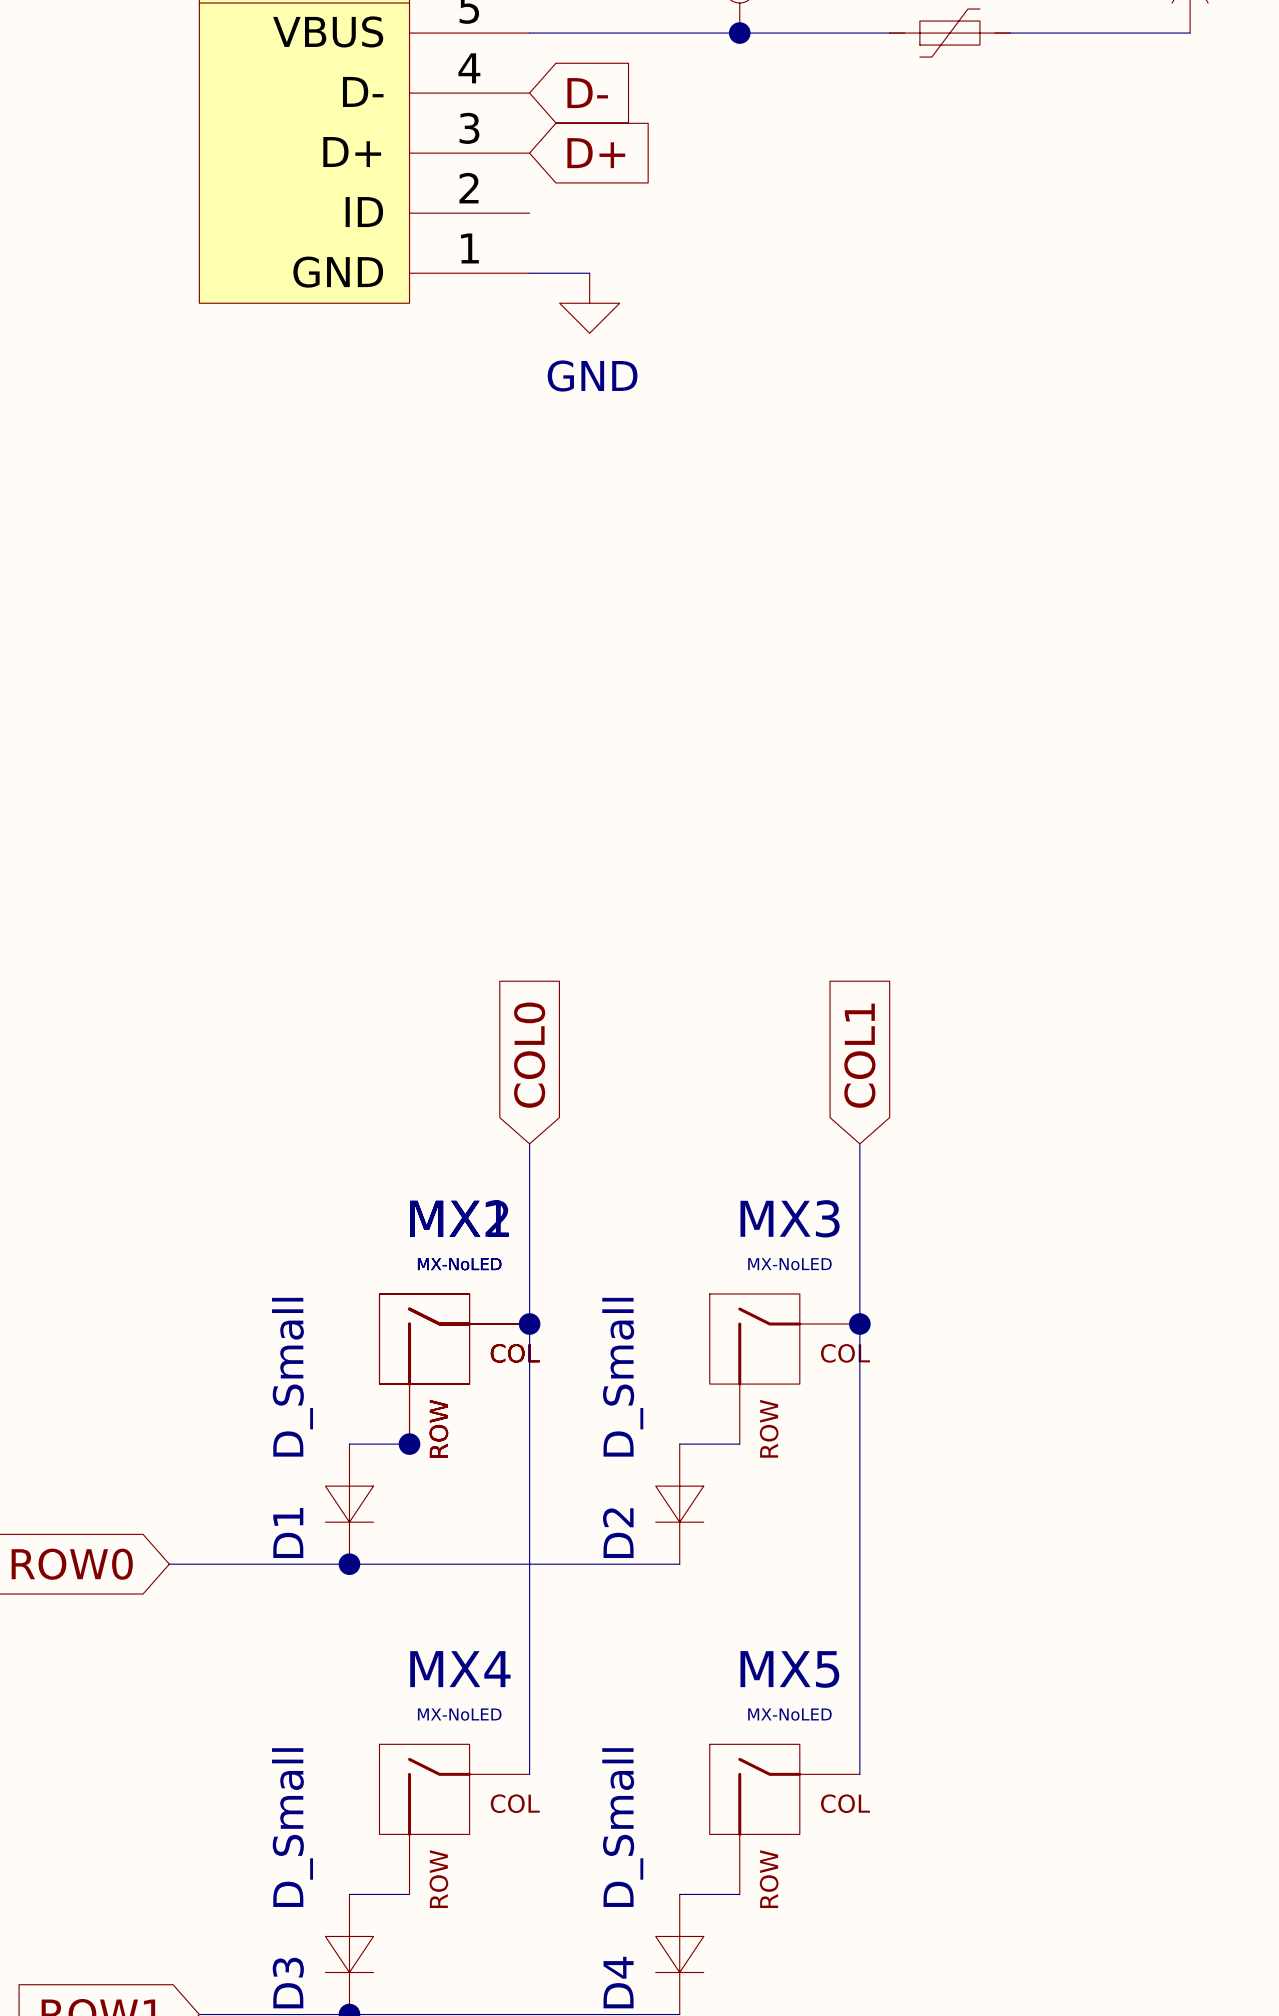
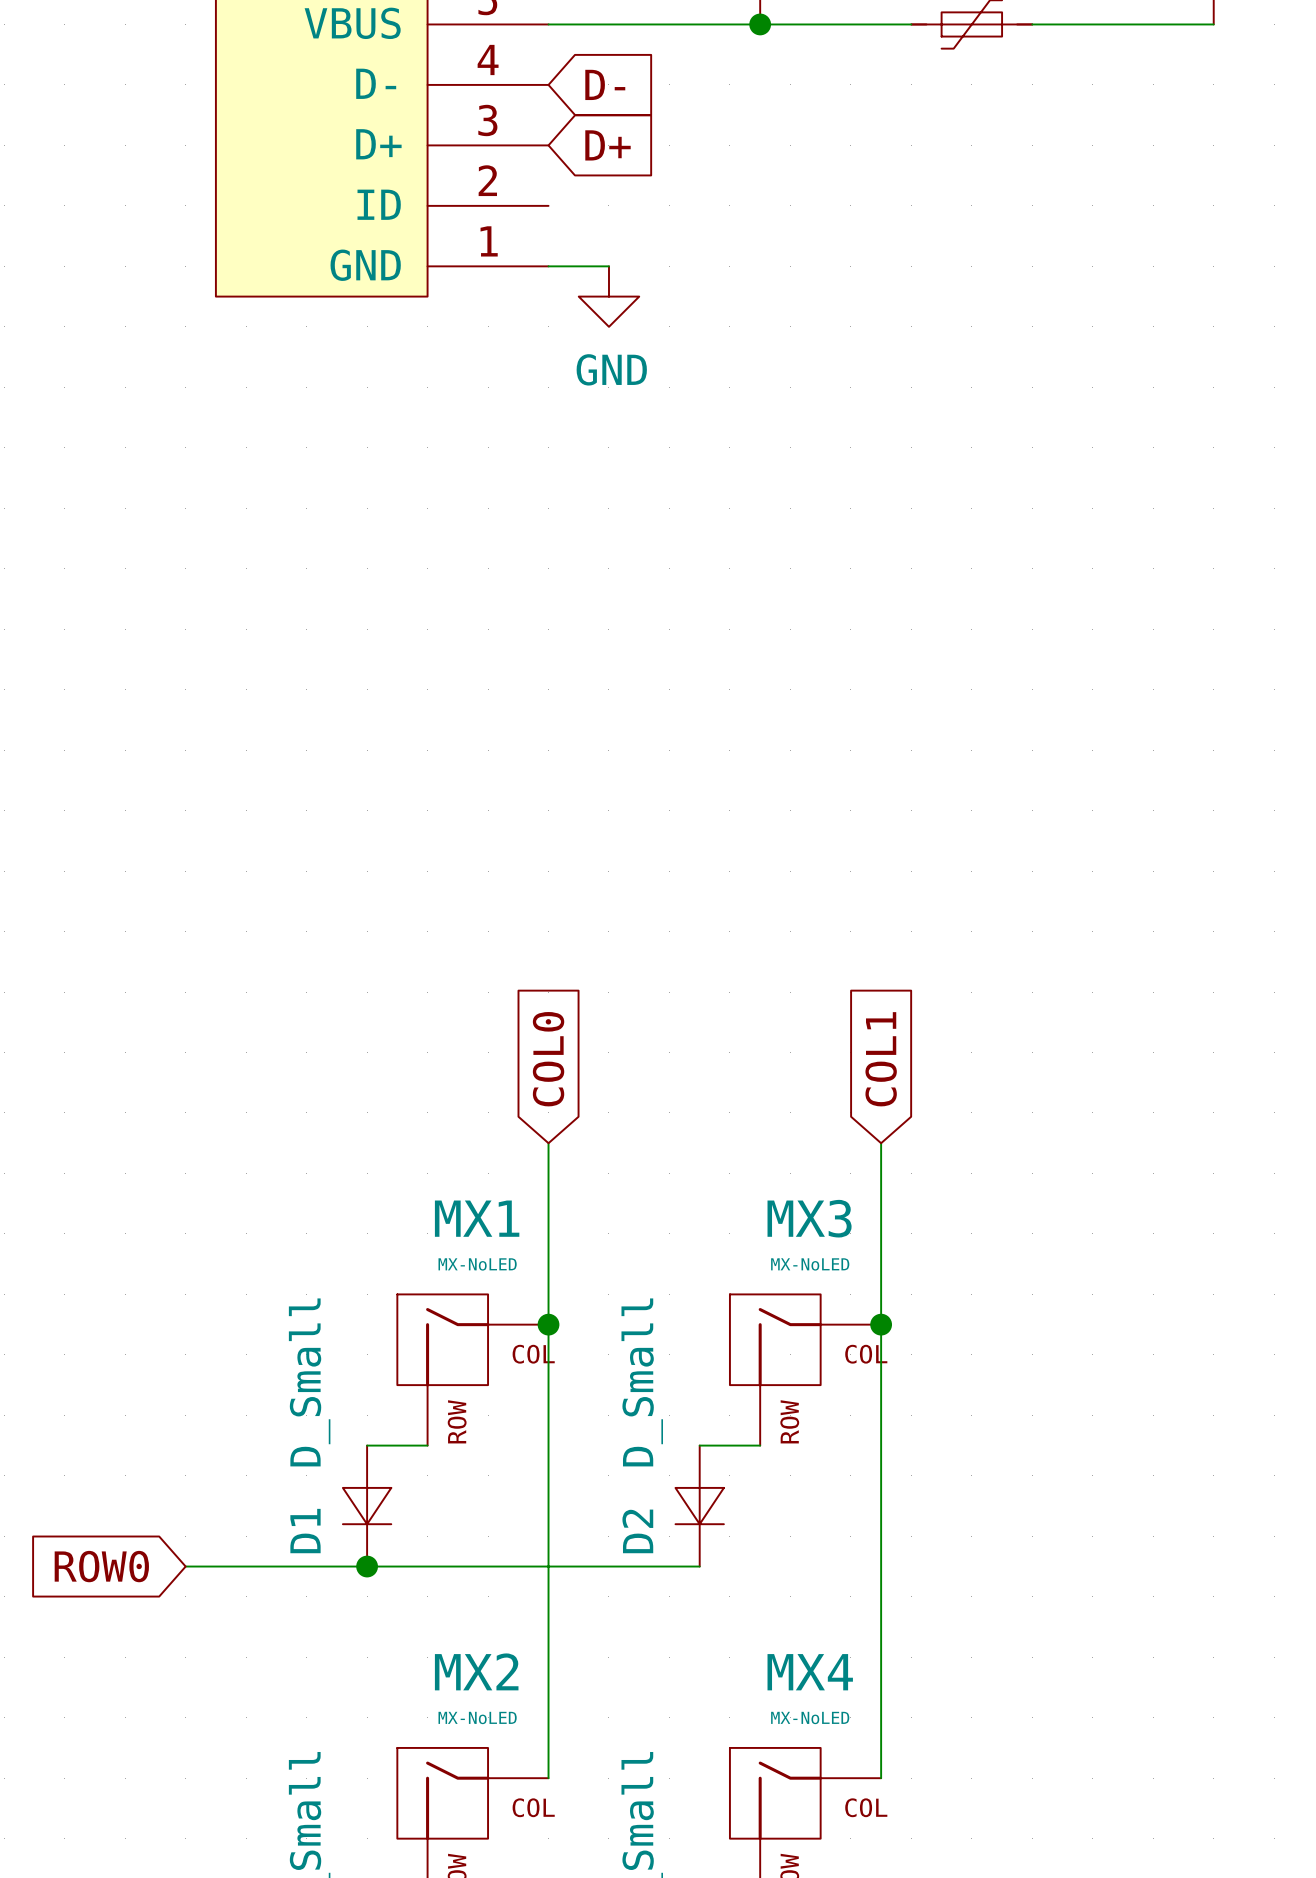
part: MX-NoLED (454, 1369) -> none
junction: (409, 1444) -> none
MX4 name: MX4 (460, 1669) -> MX2 (476, 1671)
MX5 name: MX5 (789, 1669) -> MX4 (810, 1672)

